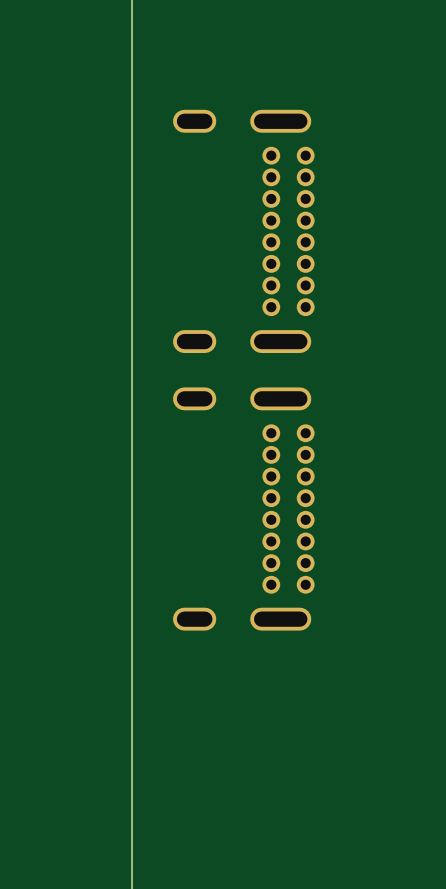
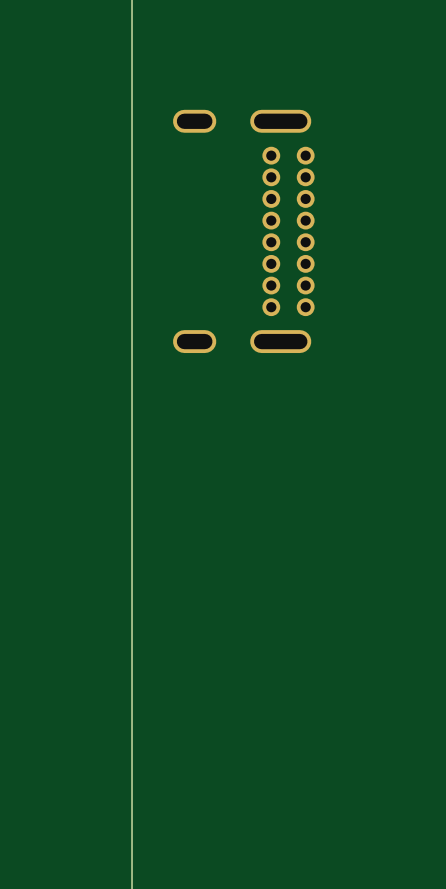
part: (243, 509) -> none

